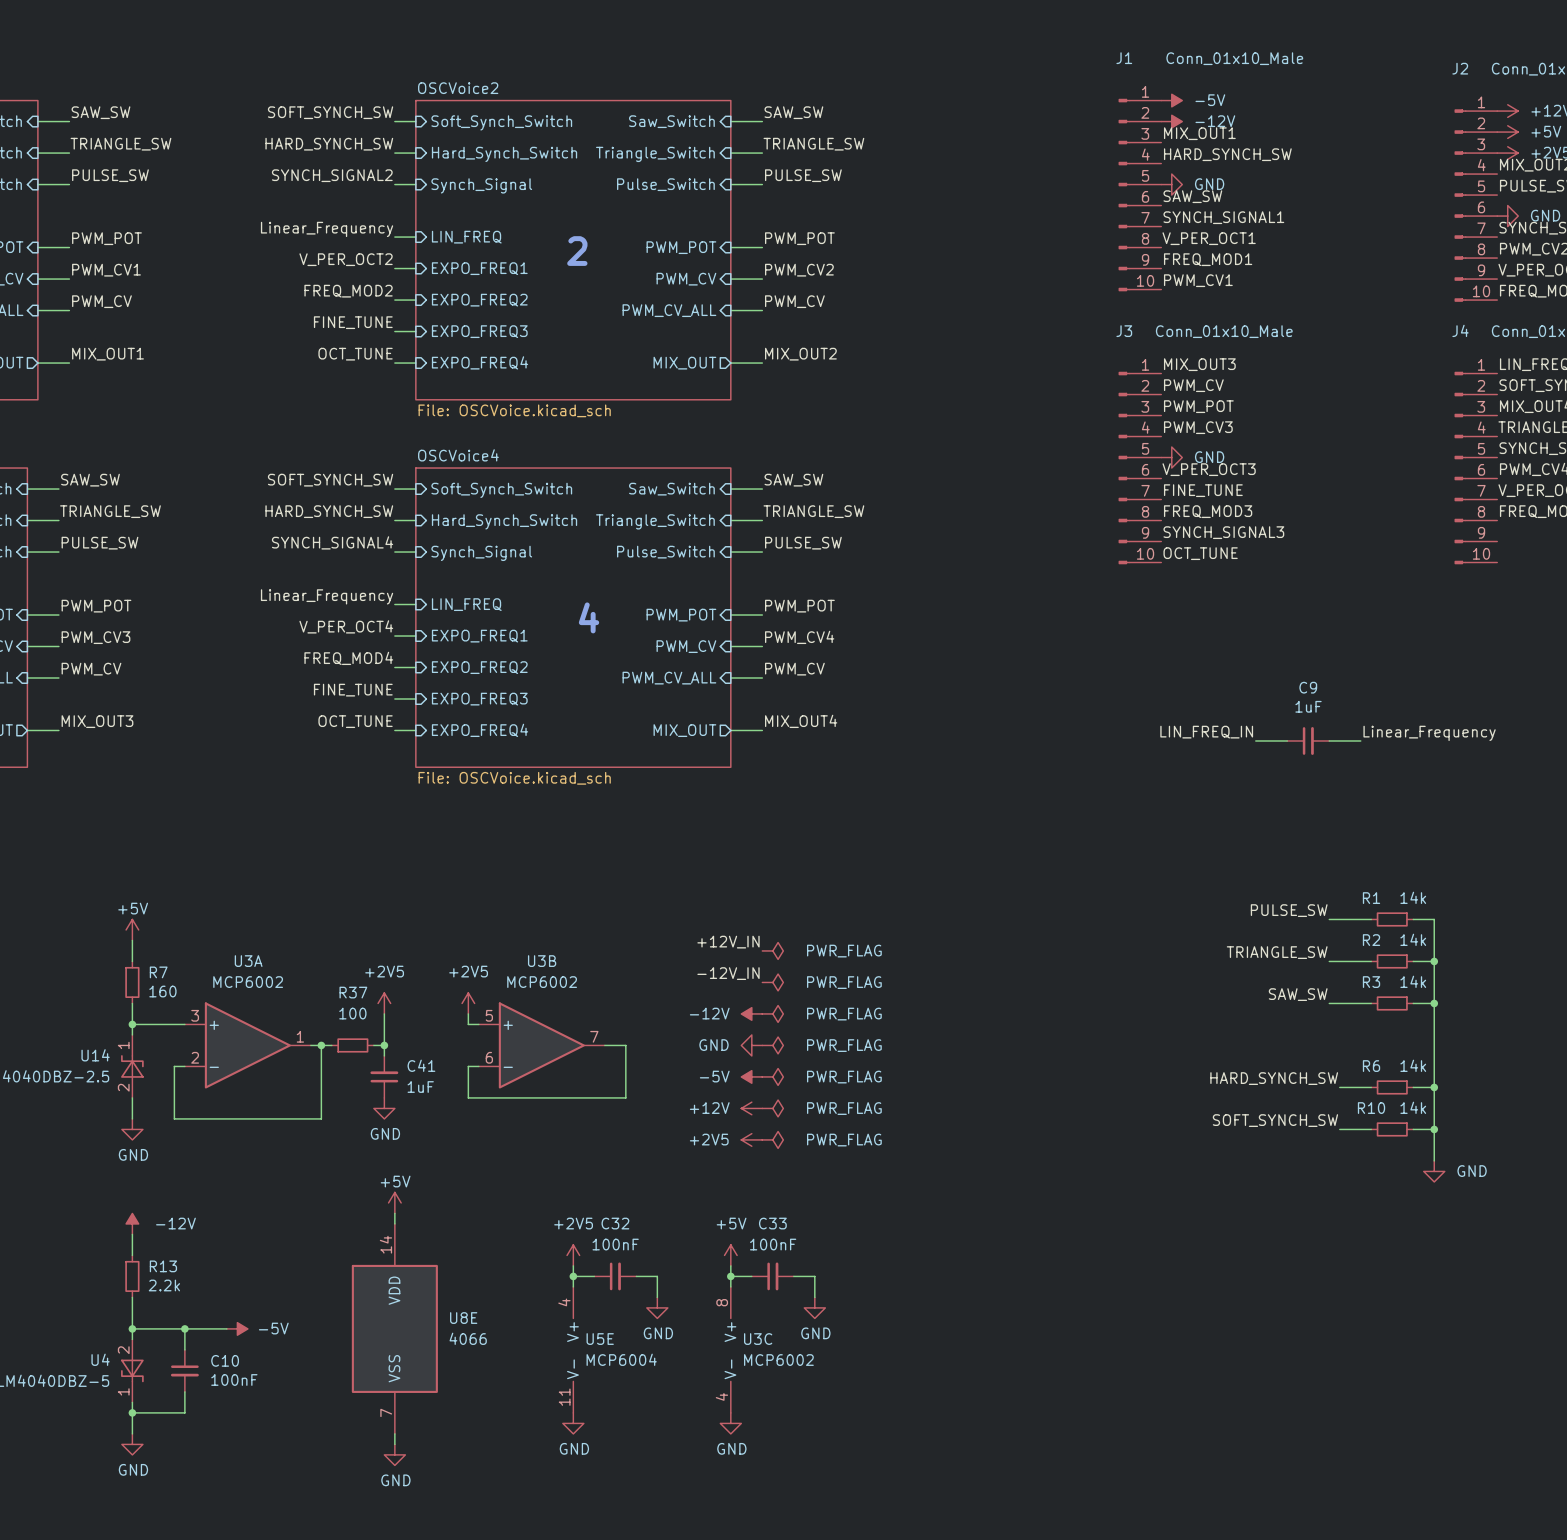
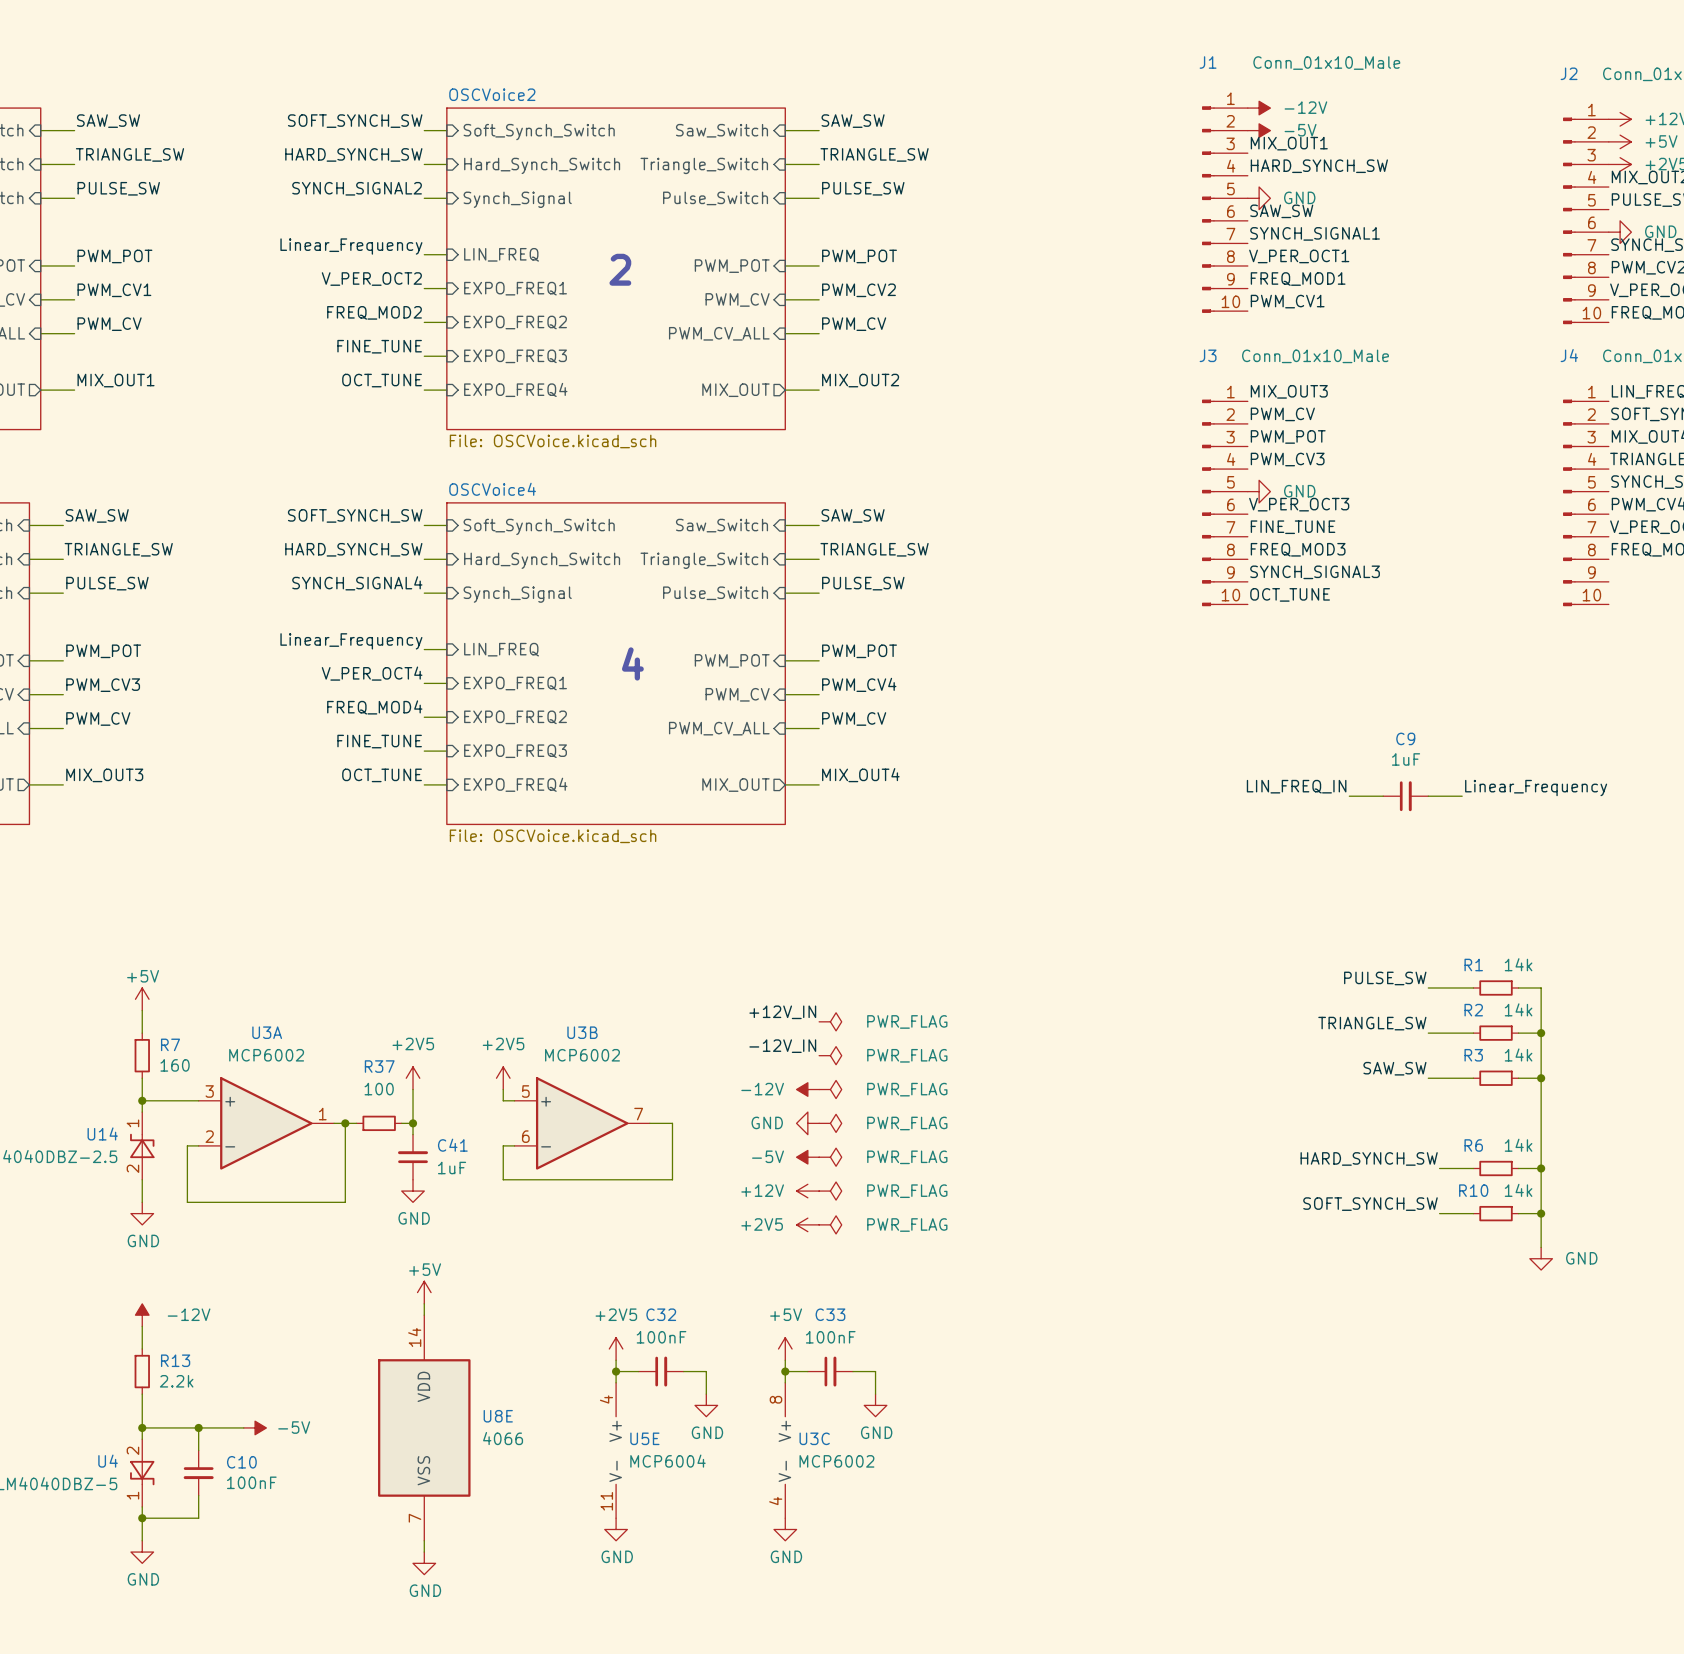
power symbol: -5V (1171, 100) -> -12V (1259, 108)
power symbol: -12V (1171, 121) -> -5V (1259, 130)

